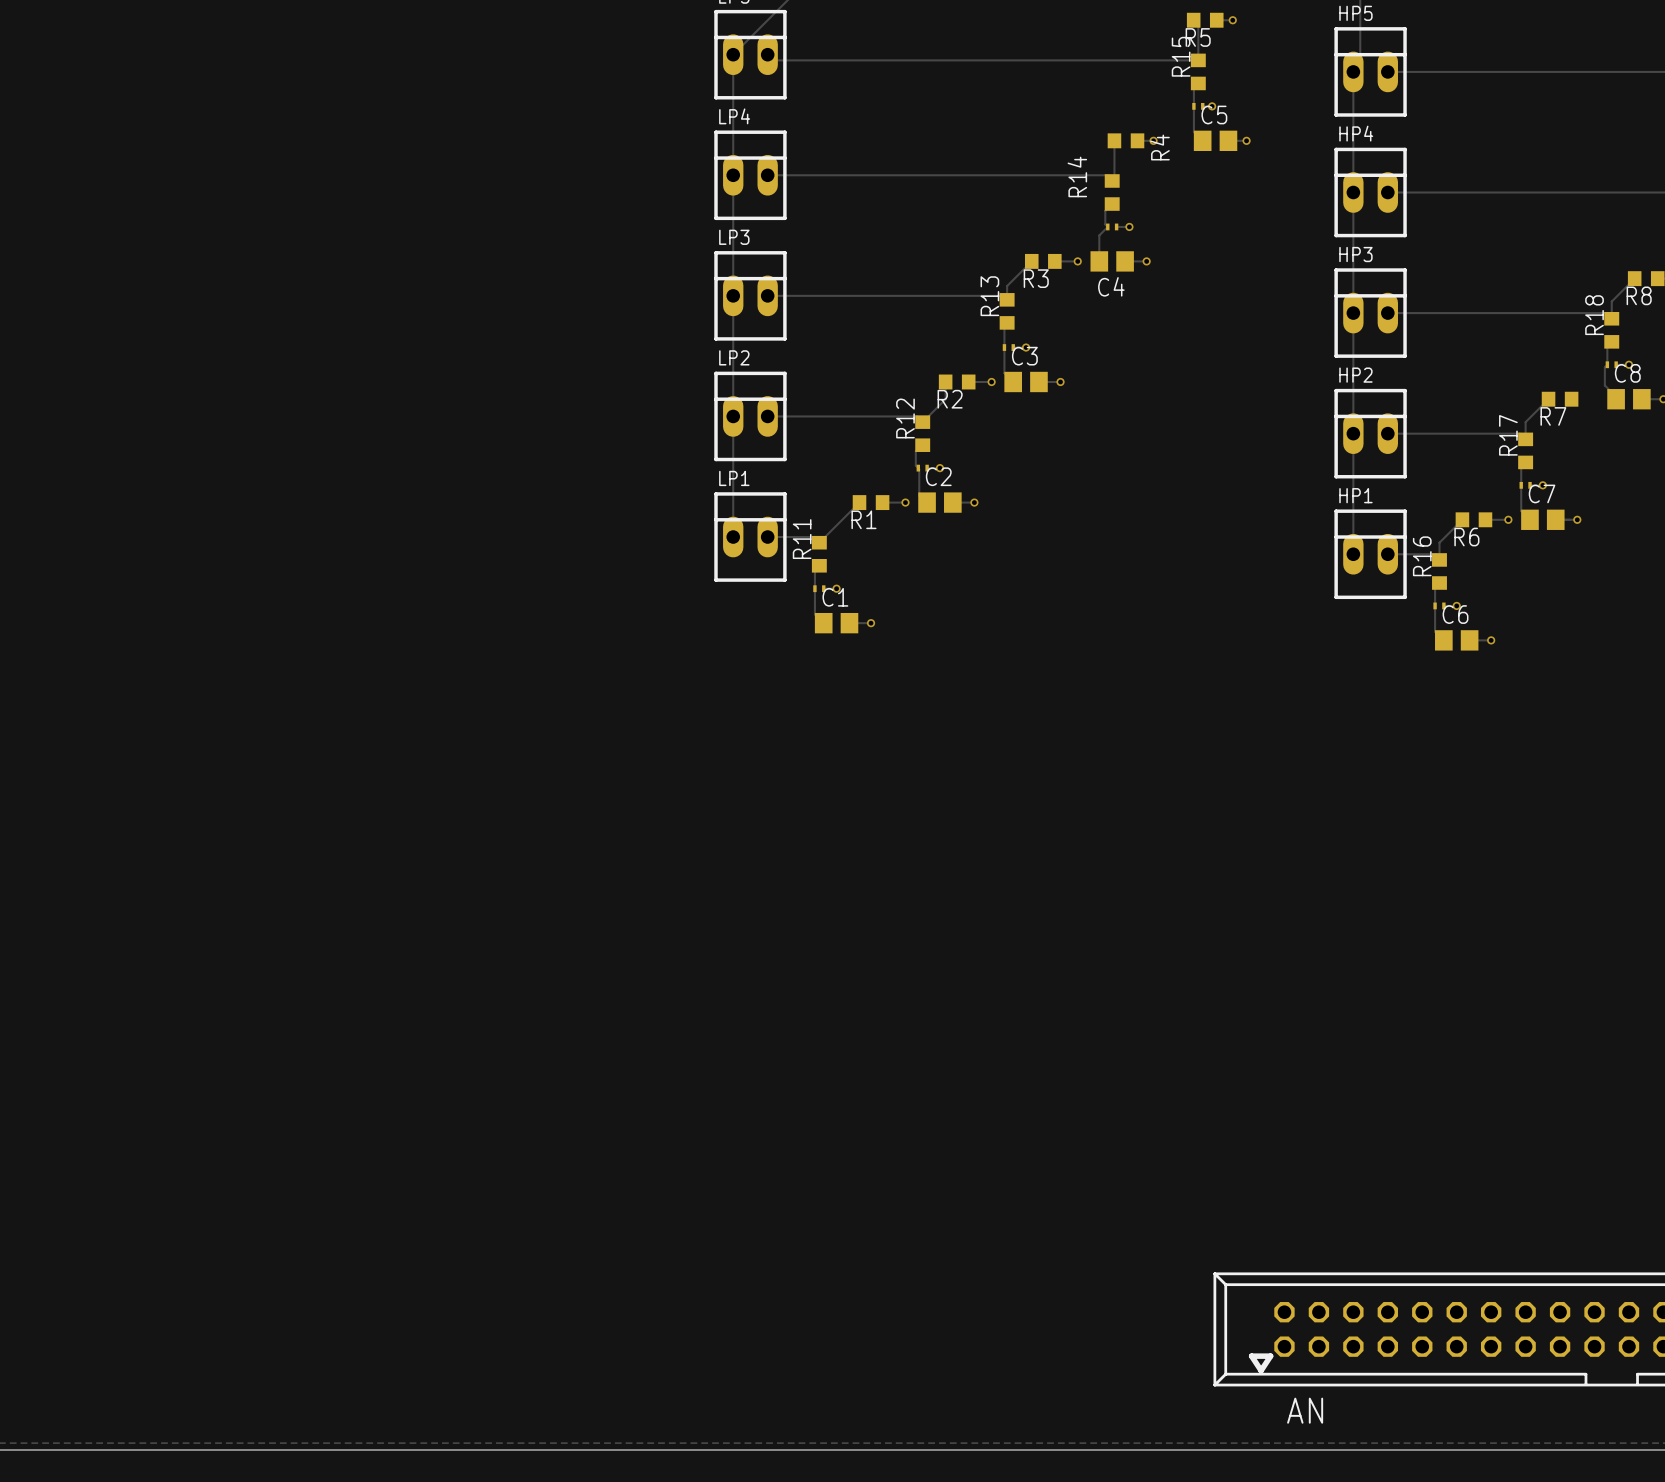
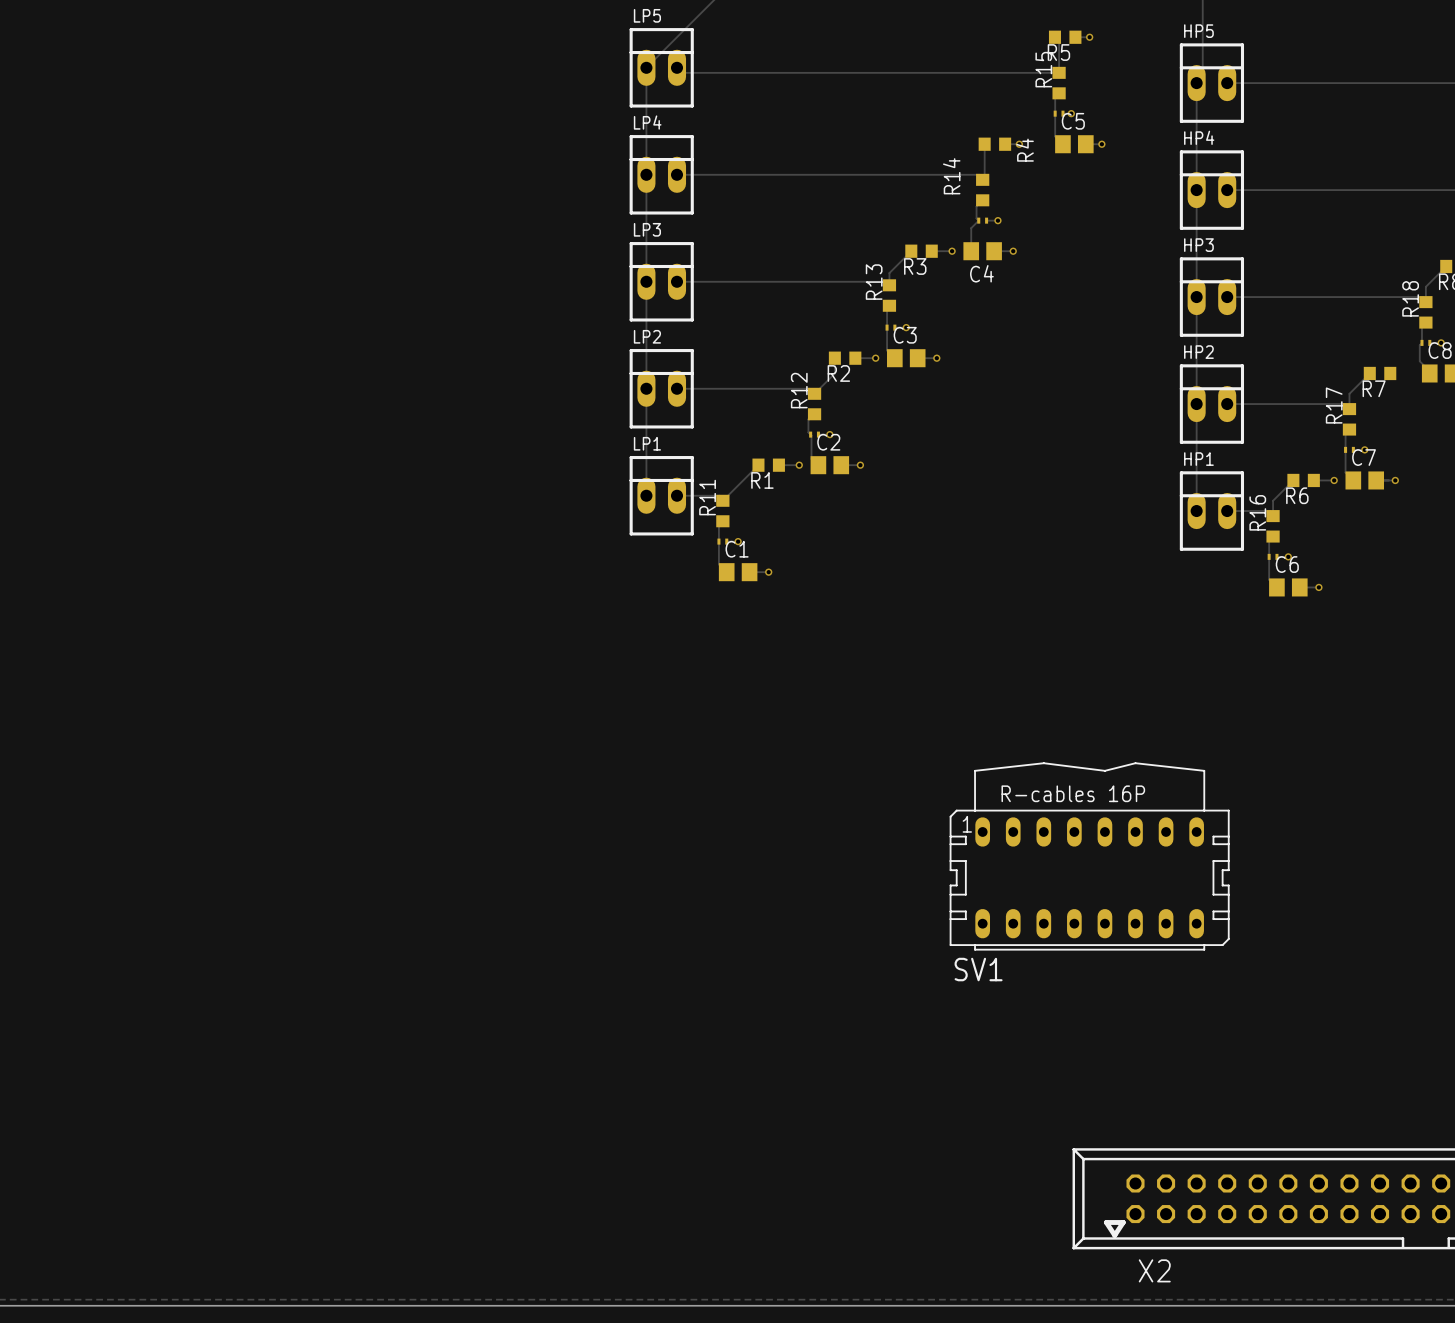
SV1: none -> (1089, 856)
AN name: AN (1305, 1410) -> X2 (1154, 1270)

